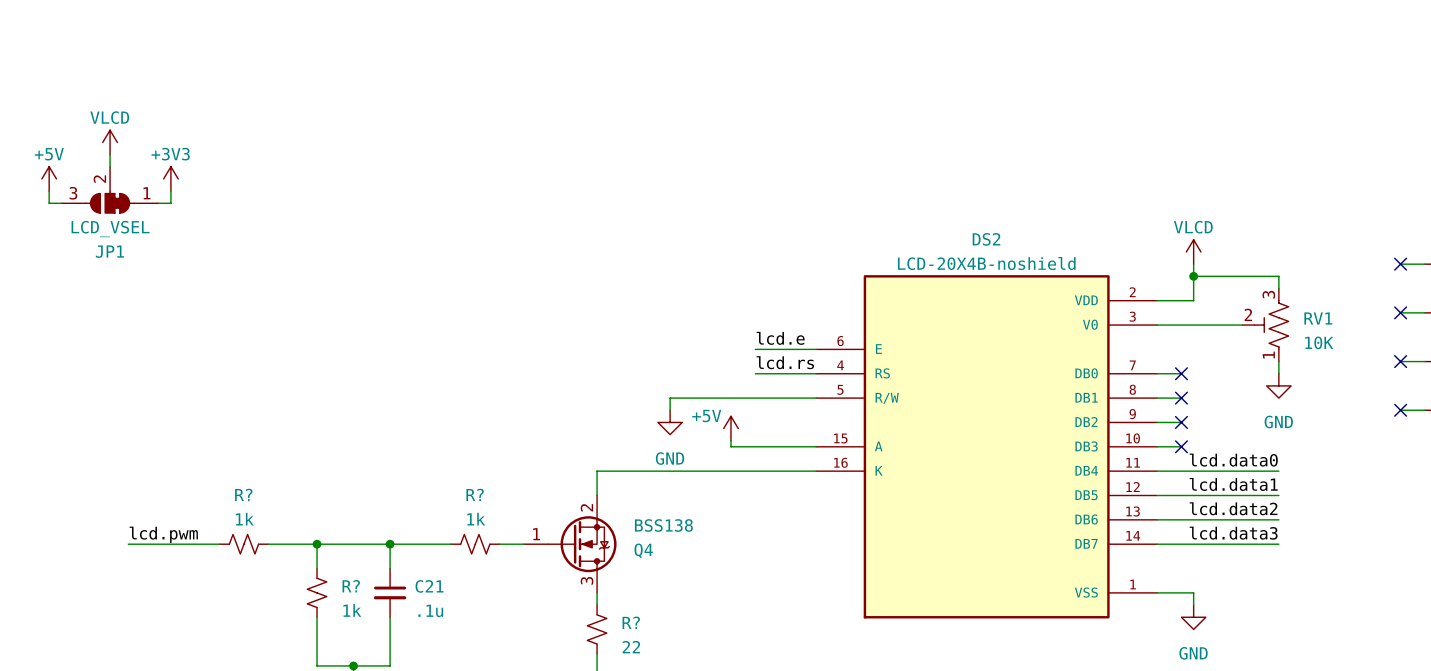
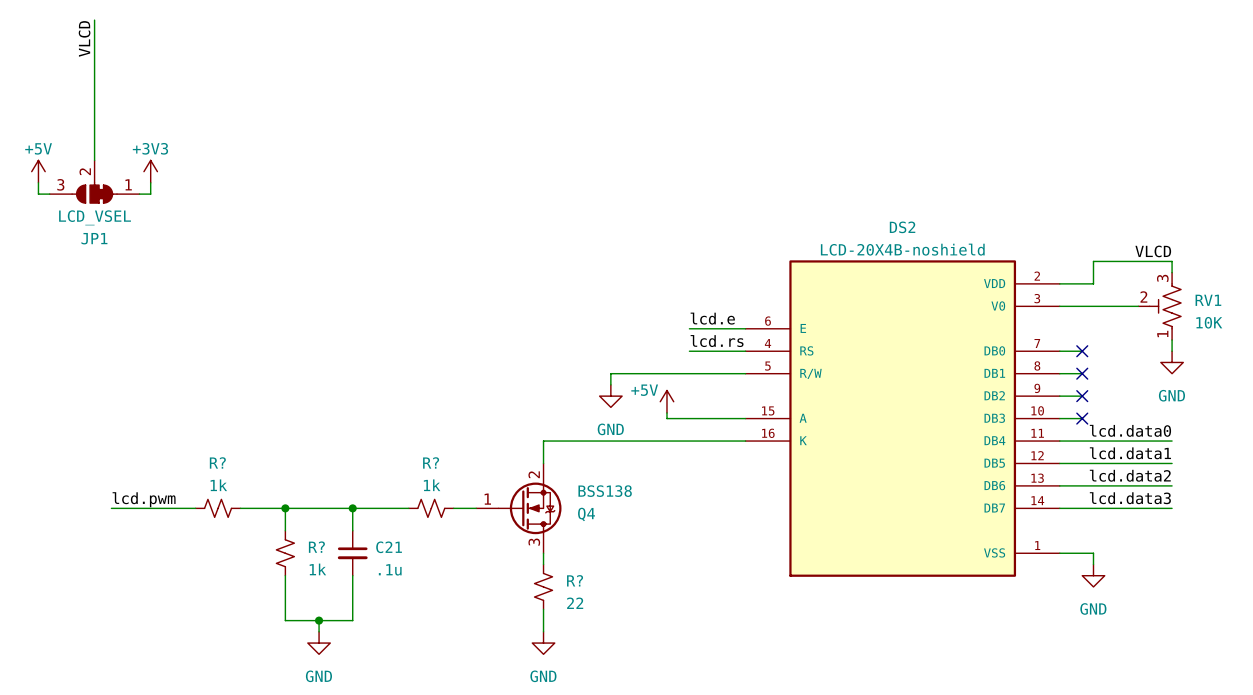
wire: none -> (94, 20) (94, 149)
label: none -> VLCD (84, 38)
power symbol: VLCD (110, 142) -> none
power symbol: VLCD (1193, 251) -> none
wire: (1193, 264) (1193, 276) -> none
label: none -> VLCD (1153, 251)
junction: (1193, 276) -> none

